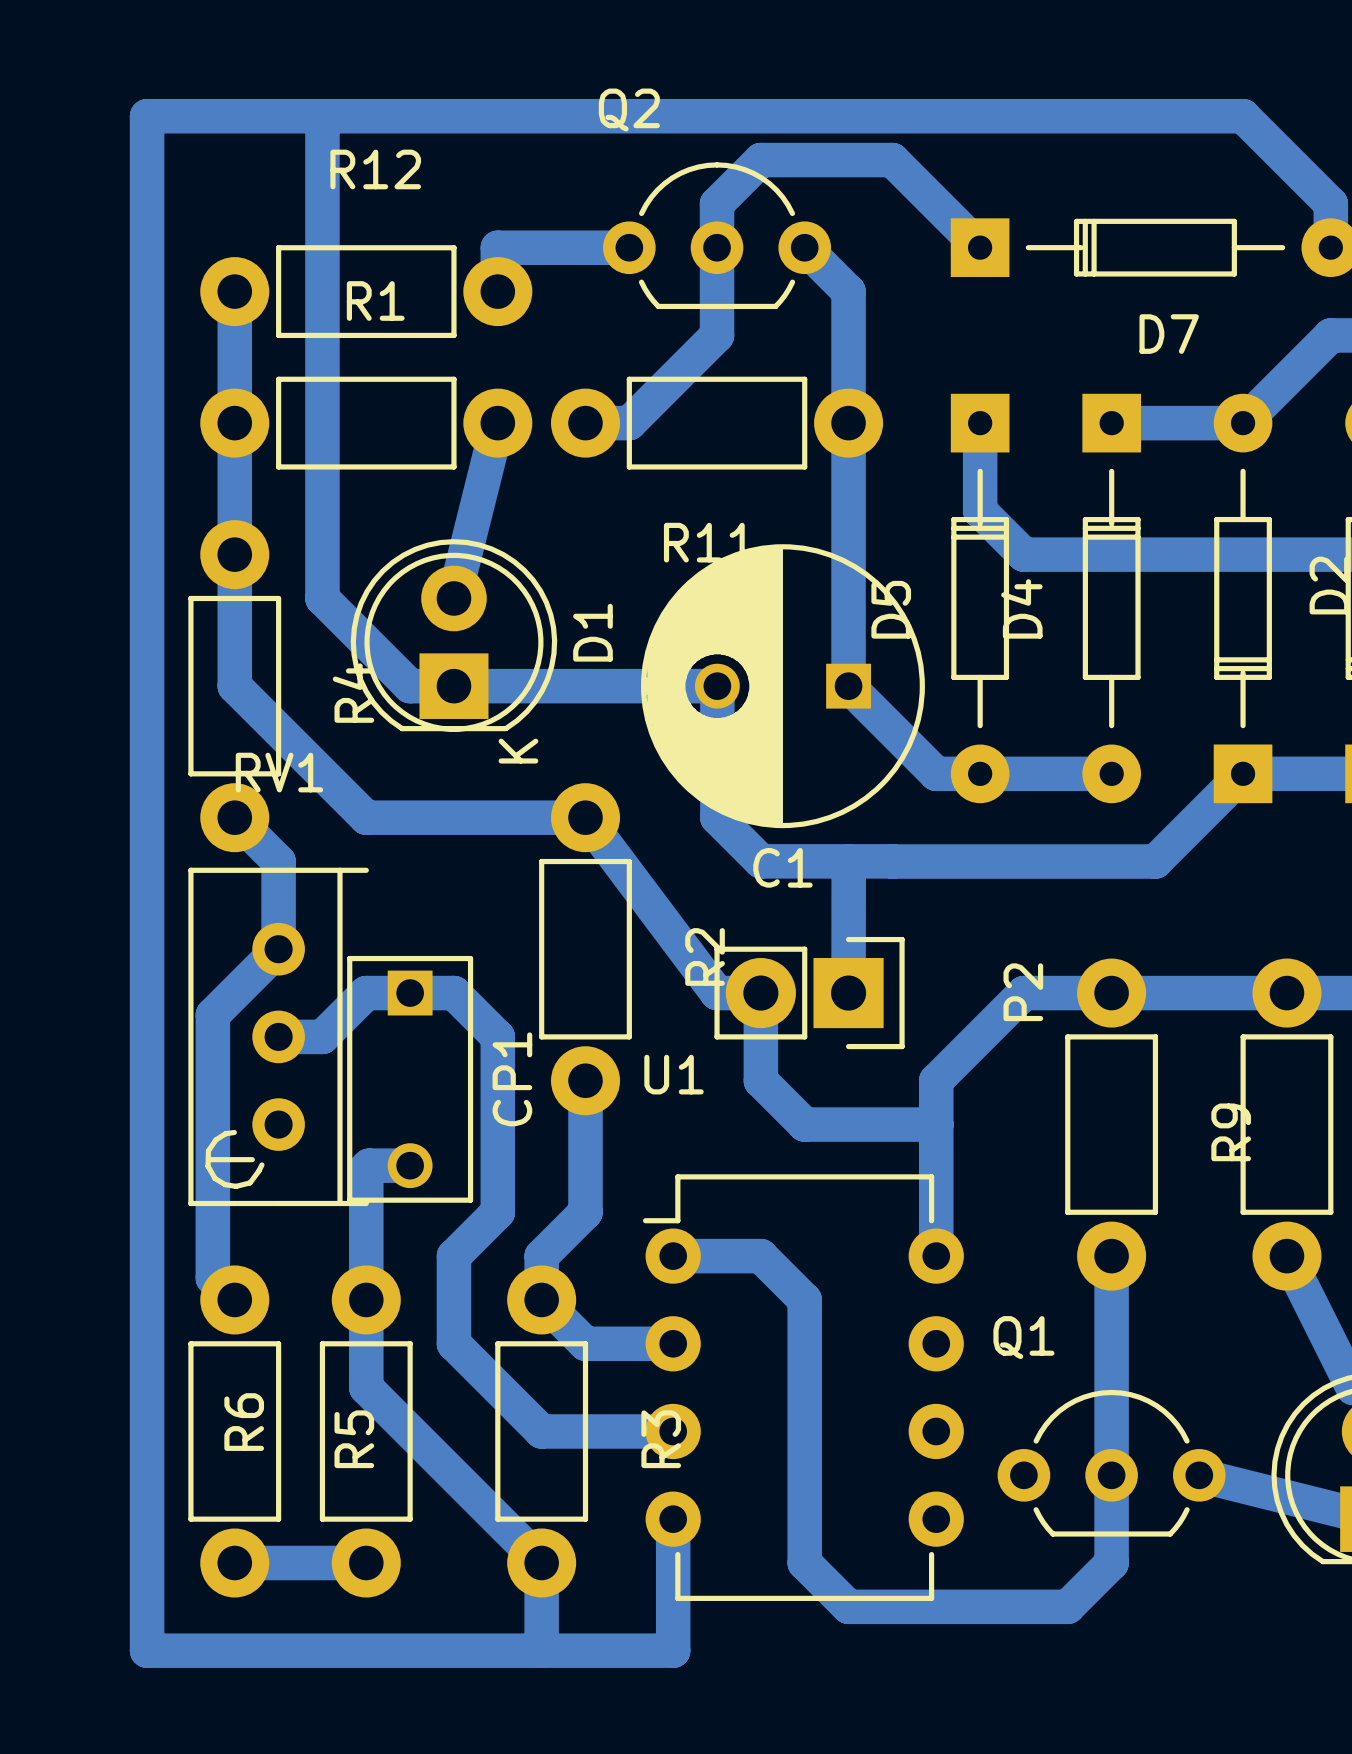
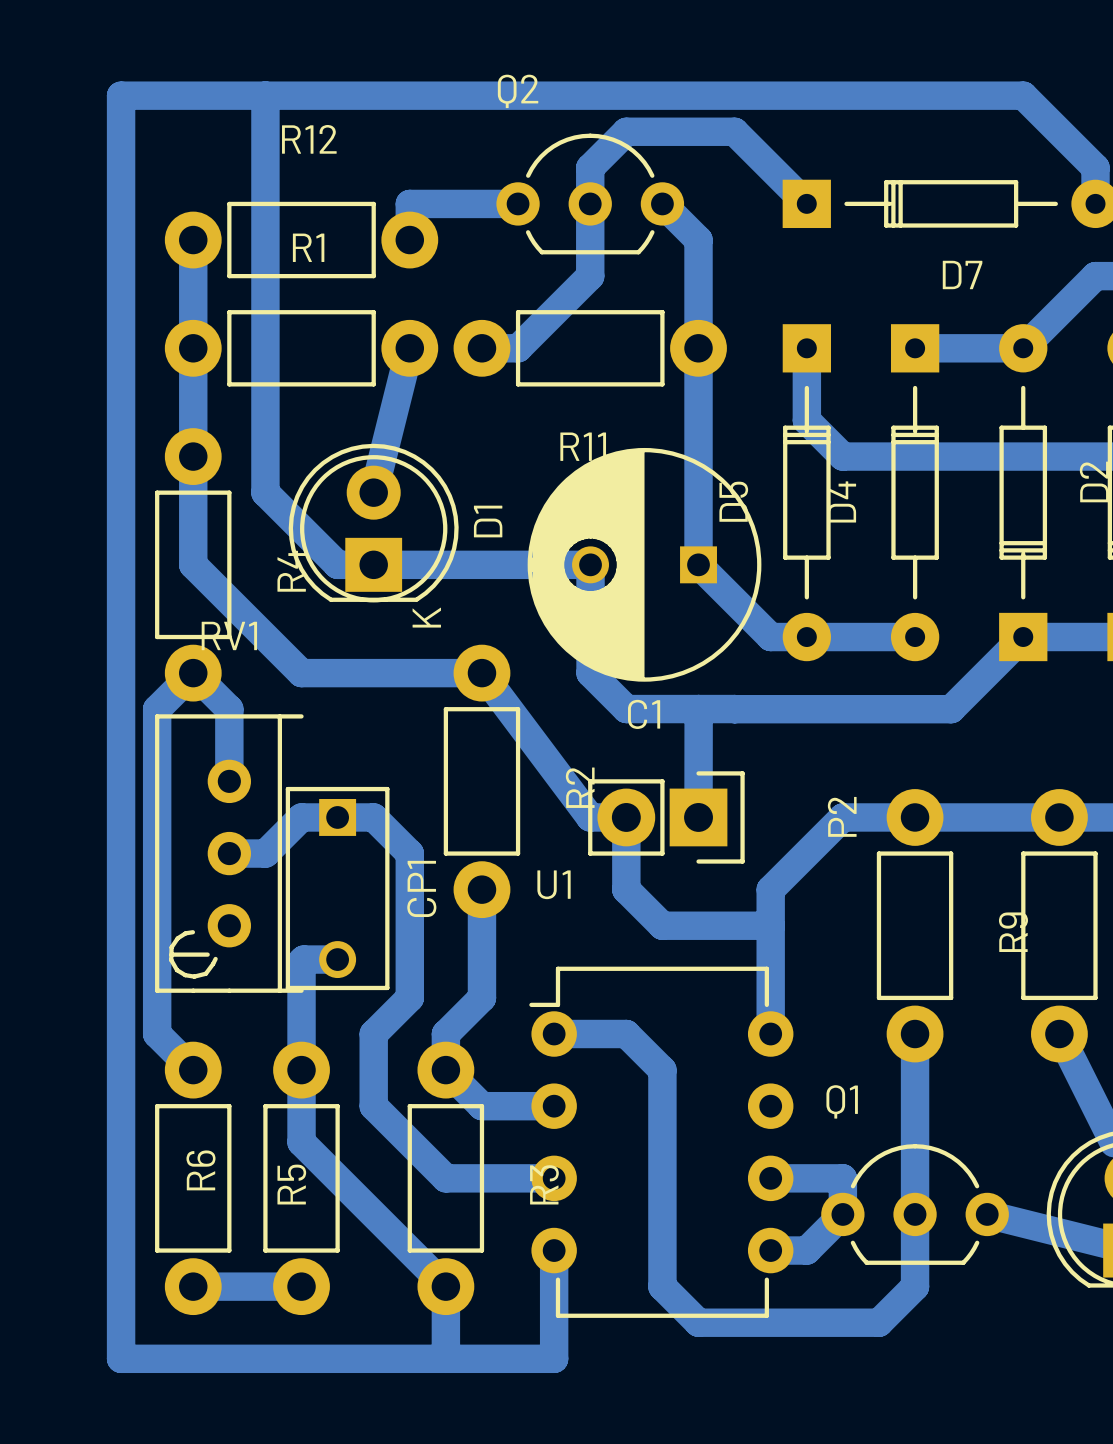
bottom track: (278, 949) (212, 1014) (212, 1278) -> (193, 673) (157, 709) (157, 1034) (175, 1052)
bottom track: none -> (770, 1178) (842, 1178) (842, 1214) (806, 1250) (770, 1250)

